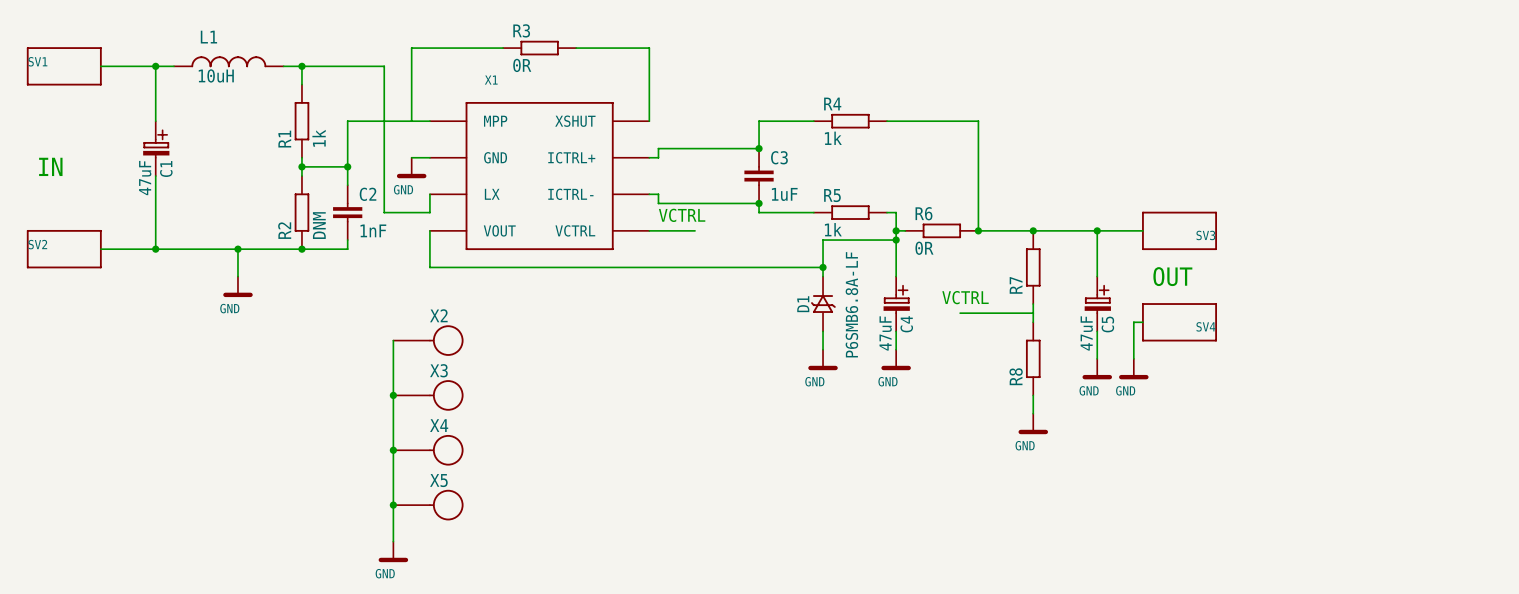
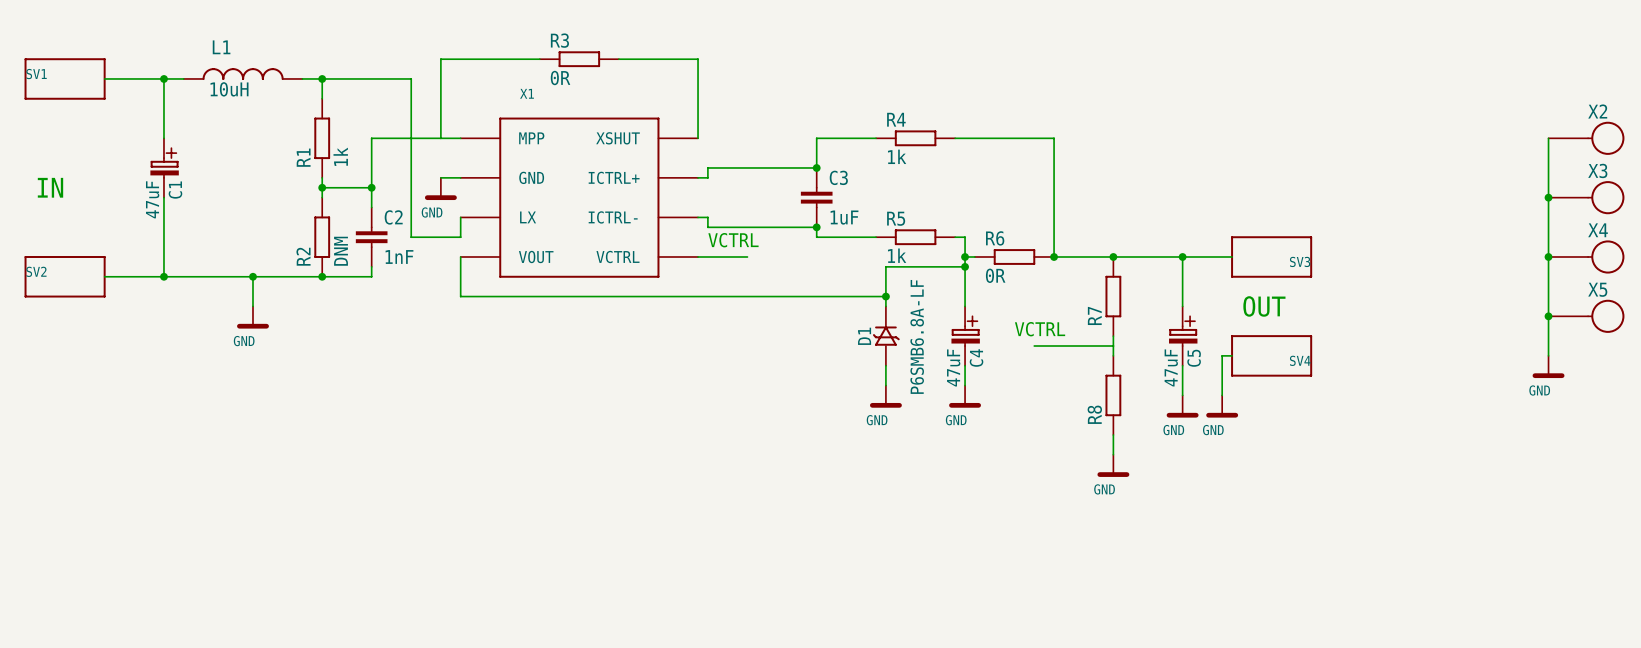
wire: none -> (1548, 138) (1548, 355)
junction: none -> (1548, 197)
junction: none -> (1548, 256)
junction: none -> (1548, 316)
power symbol: none -> (1548, 366)
wire: (393, 340) (393, 541) -> none
X2 position: (428, 340) -> (1586, 138)
junction: (393, 395) -> none
X3 position: (428, 395) -> (1586, 197)
junction: (393, 450) -> none
X4 position: (428, 450) -> (1586, 256)
junction: (393, 505) -> none
X5 position: (428, 505) -> (1586, 316)
power symbol: (393, 551) -> none

